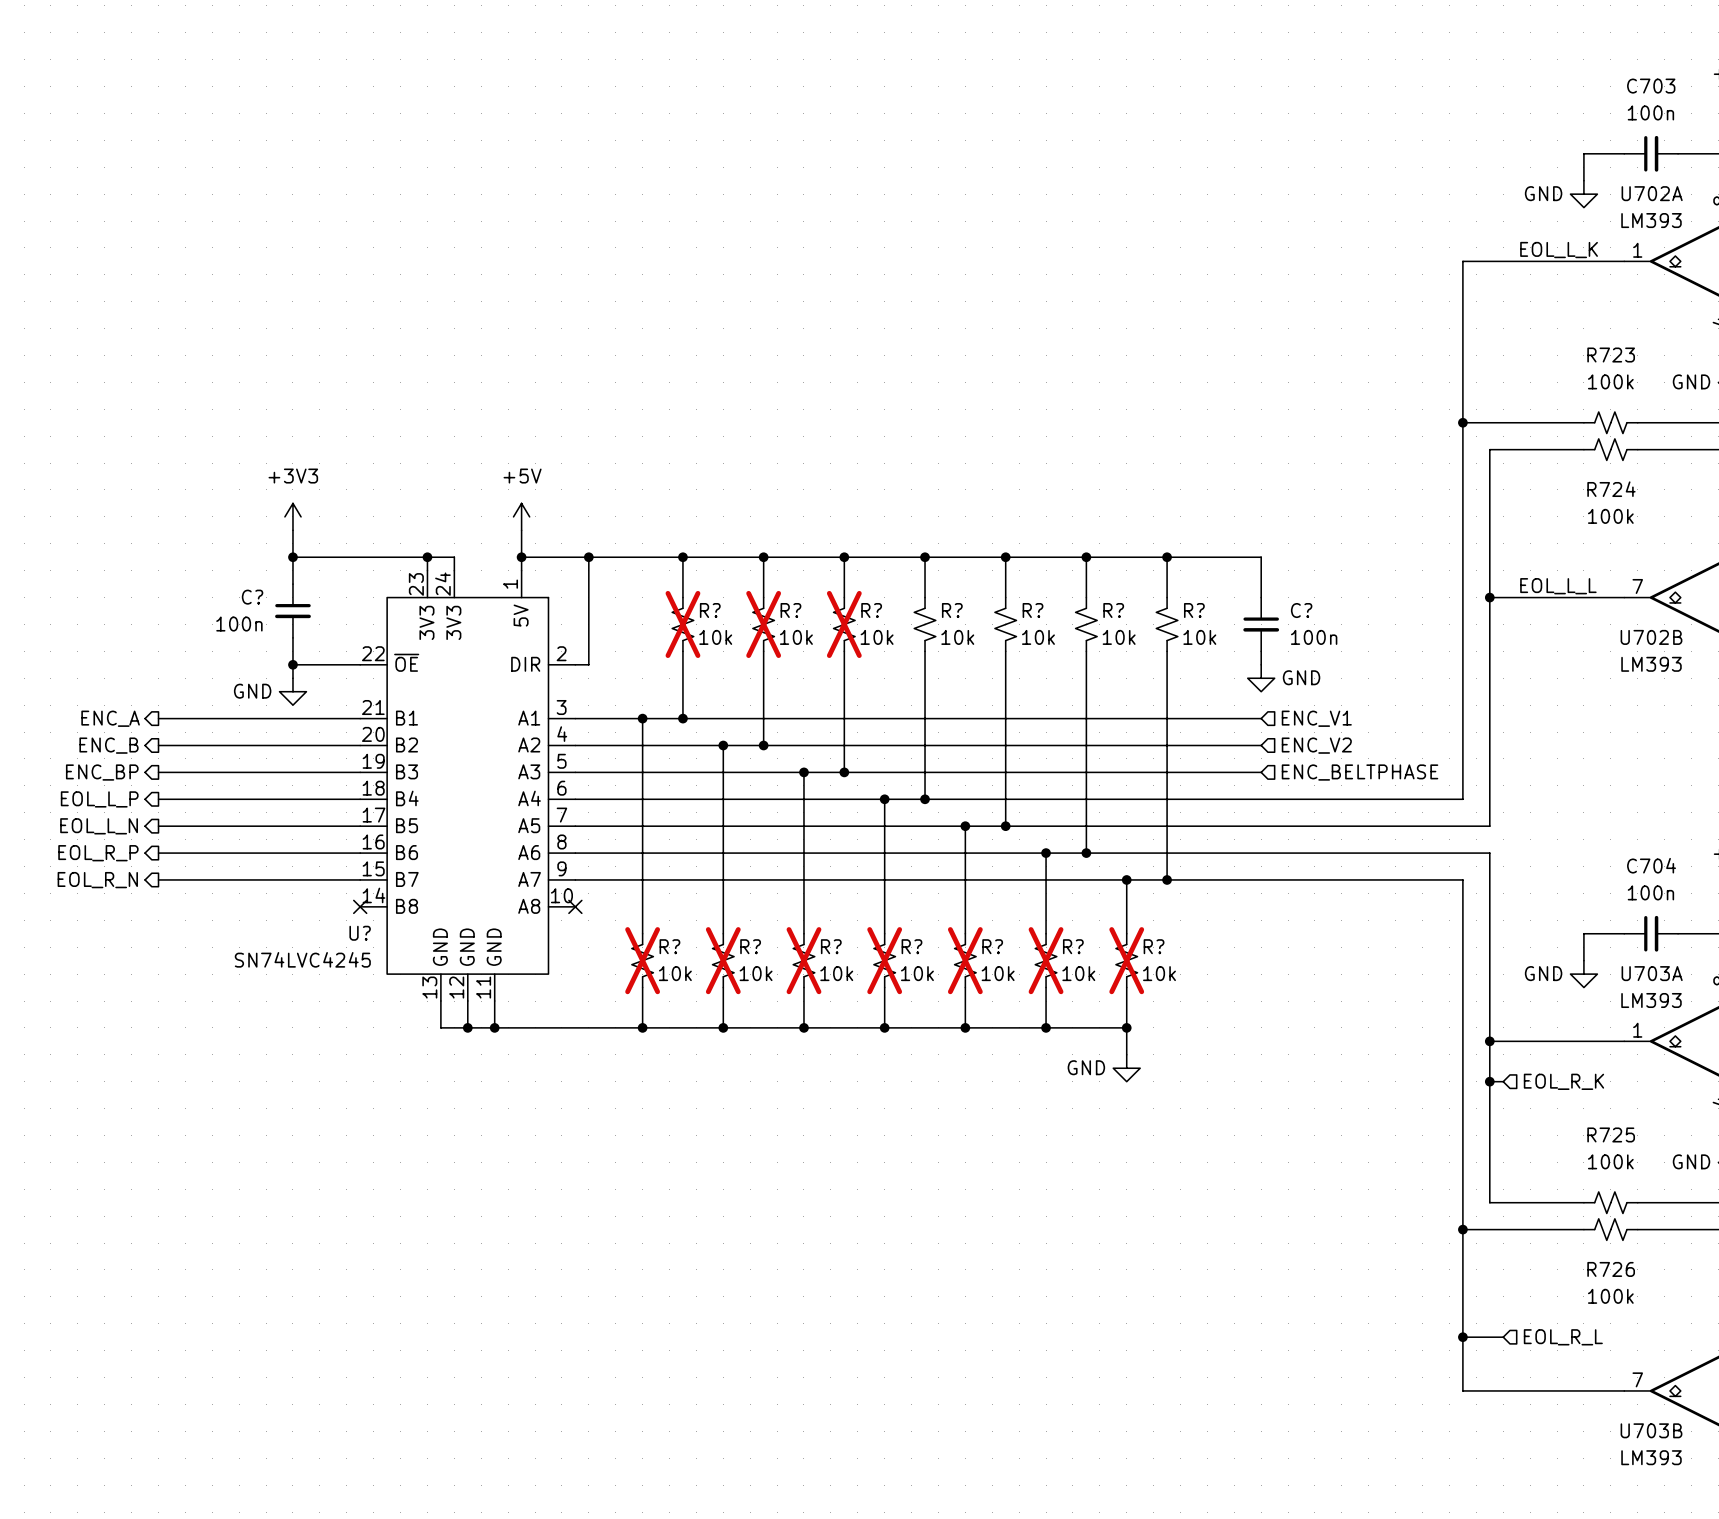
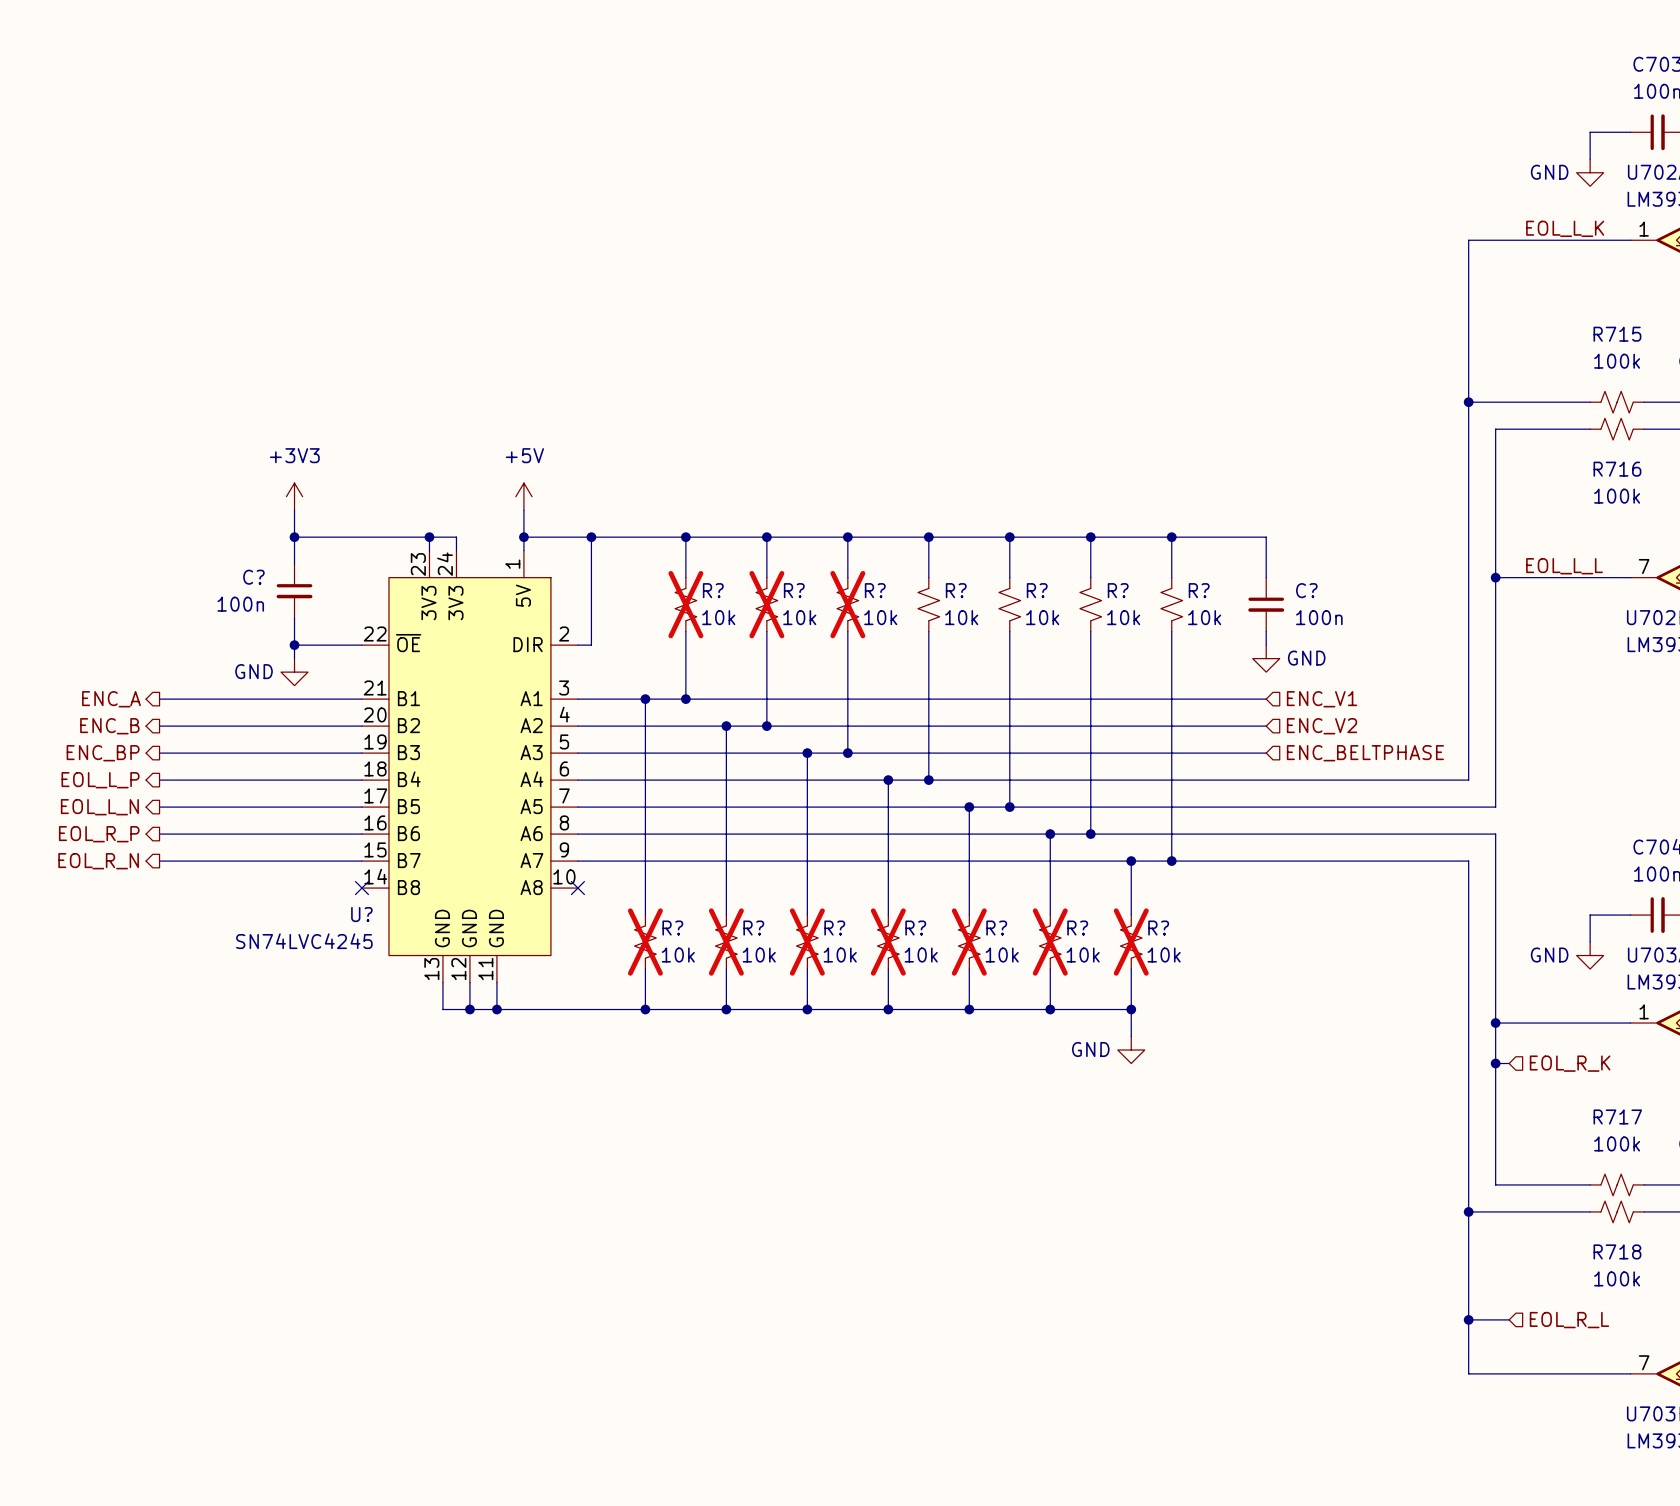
R723 name: R723 (1611, 355) -> R715 (1617, 334)
R724 name: R724 (1611, 489) -> R716 (1617, 469)
R725 name: R725 (1611, 1134) -> R717 (1617, 1116)
R726 name: R726 (1611, 1269) -> R718 (1617, 1251)

